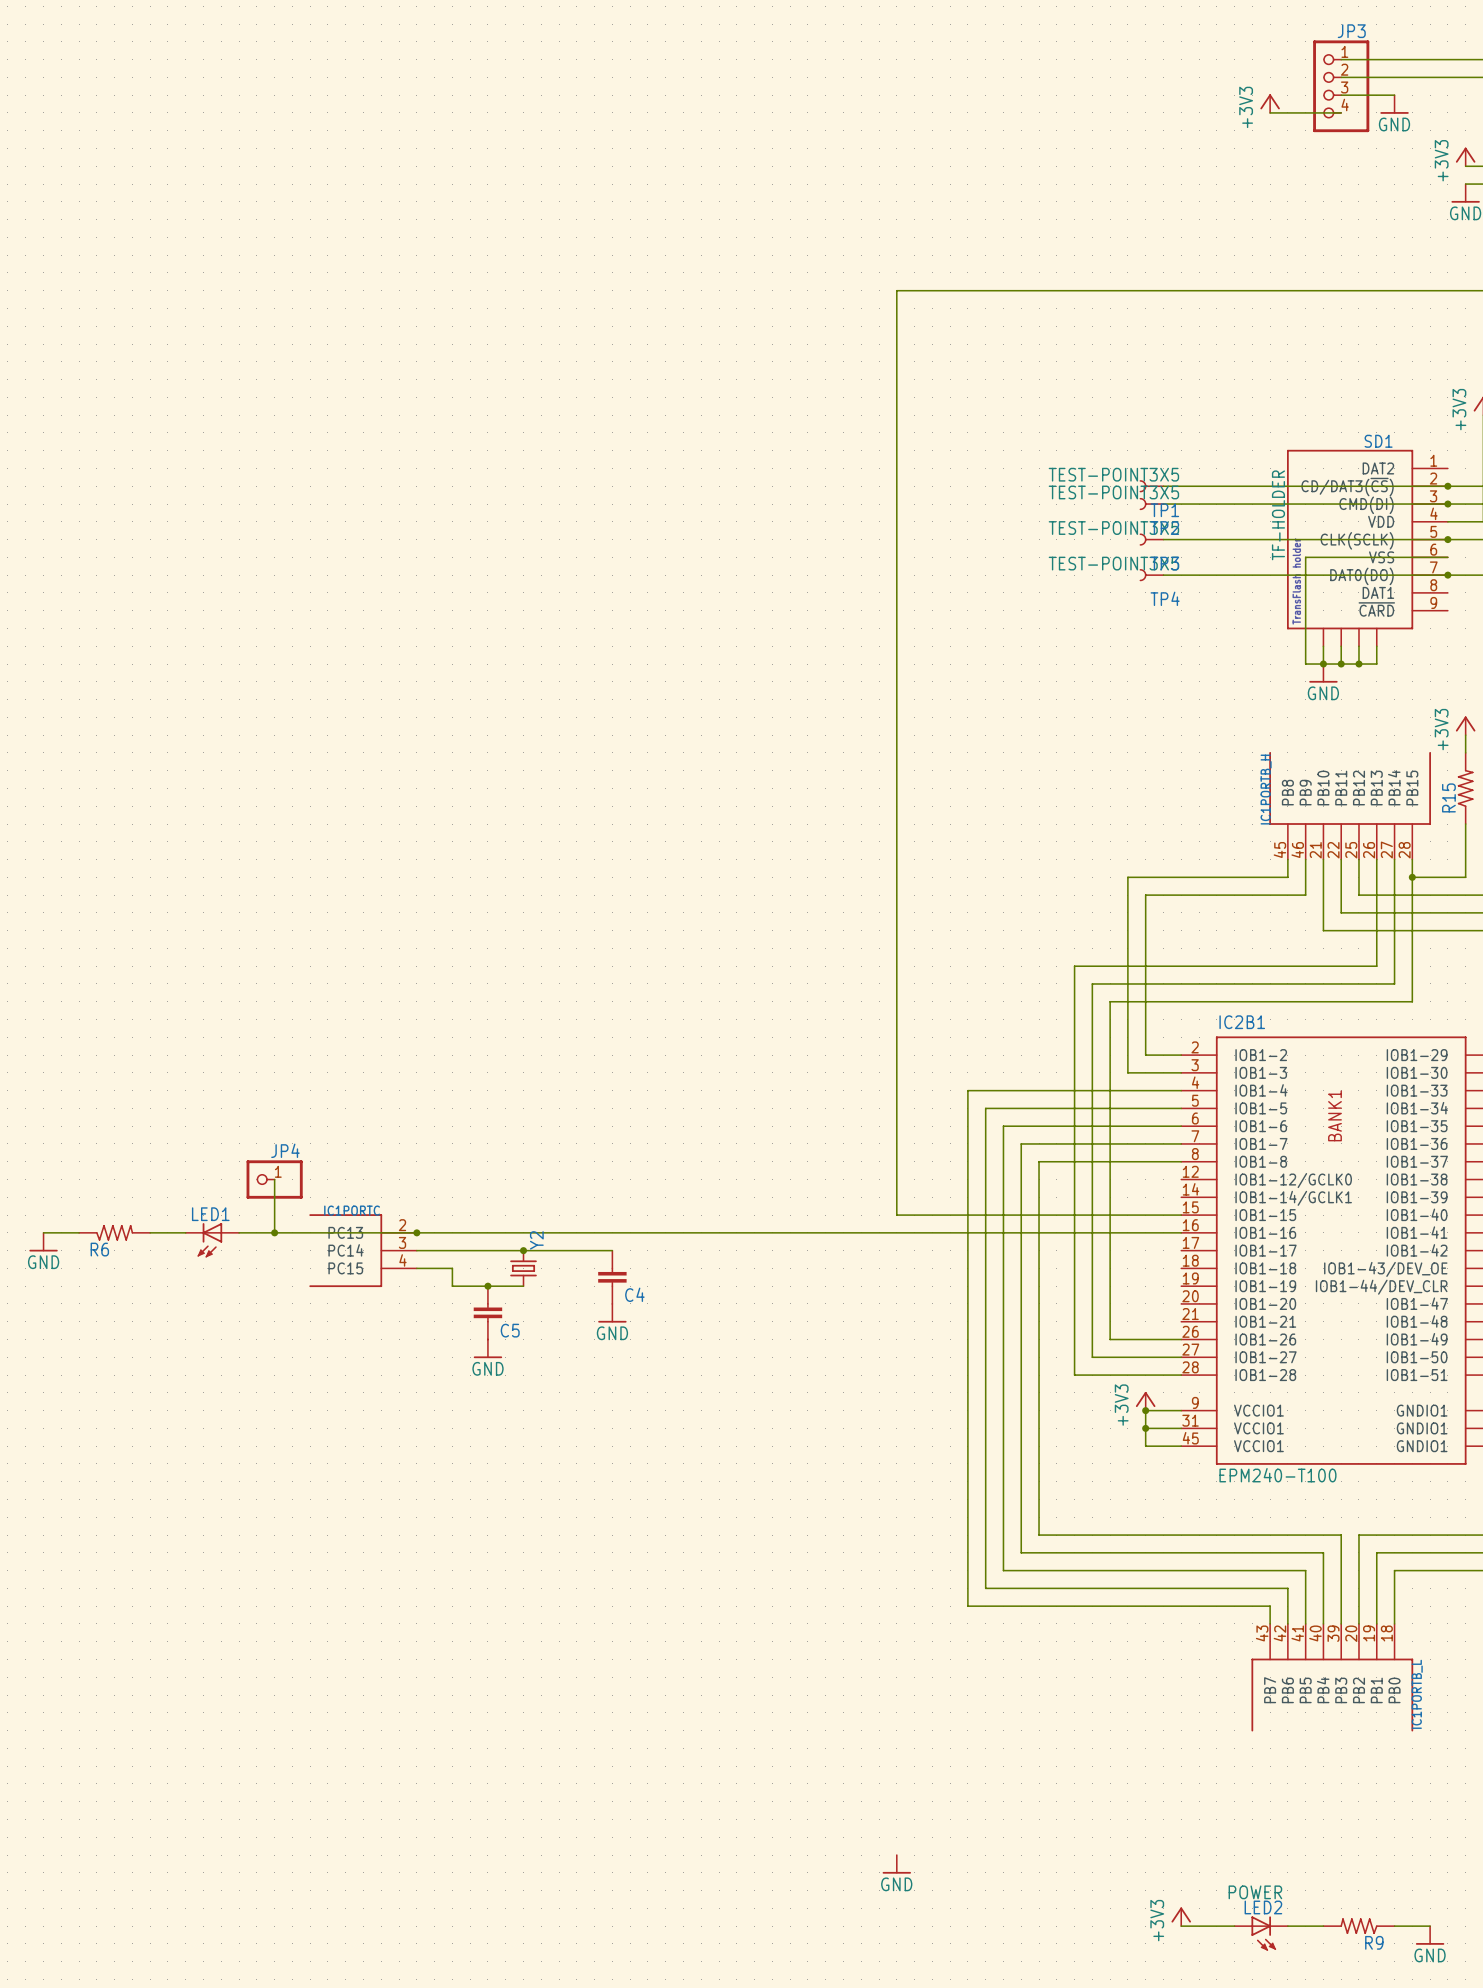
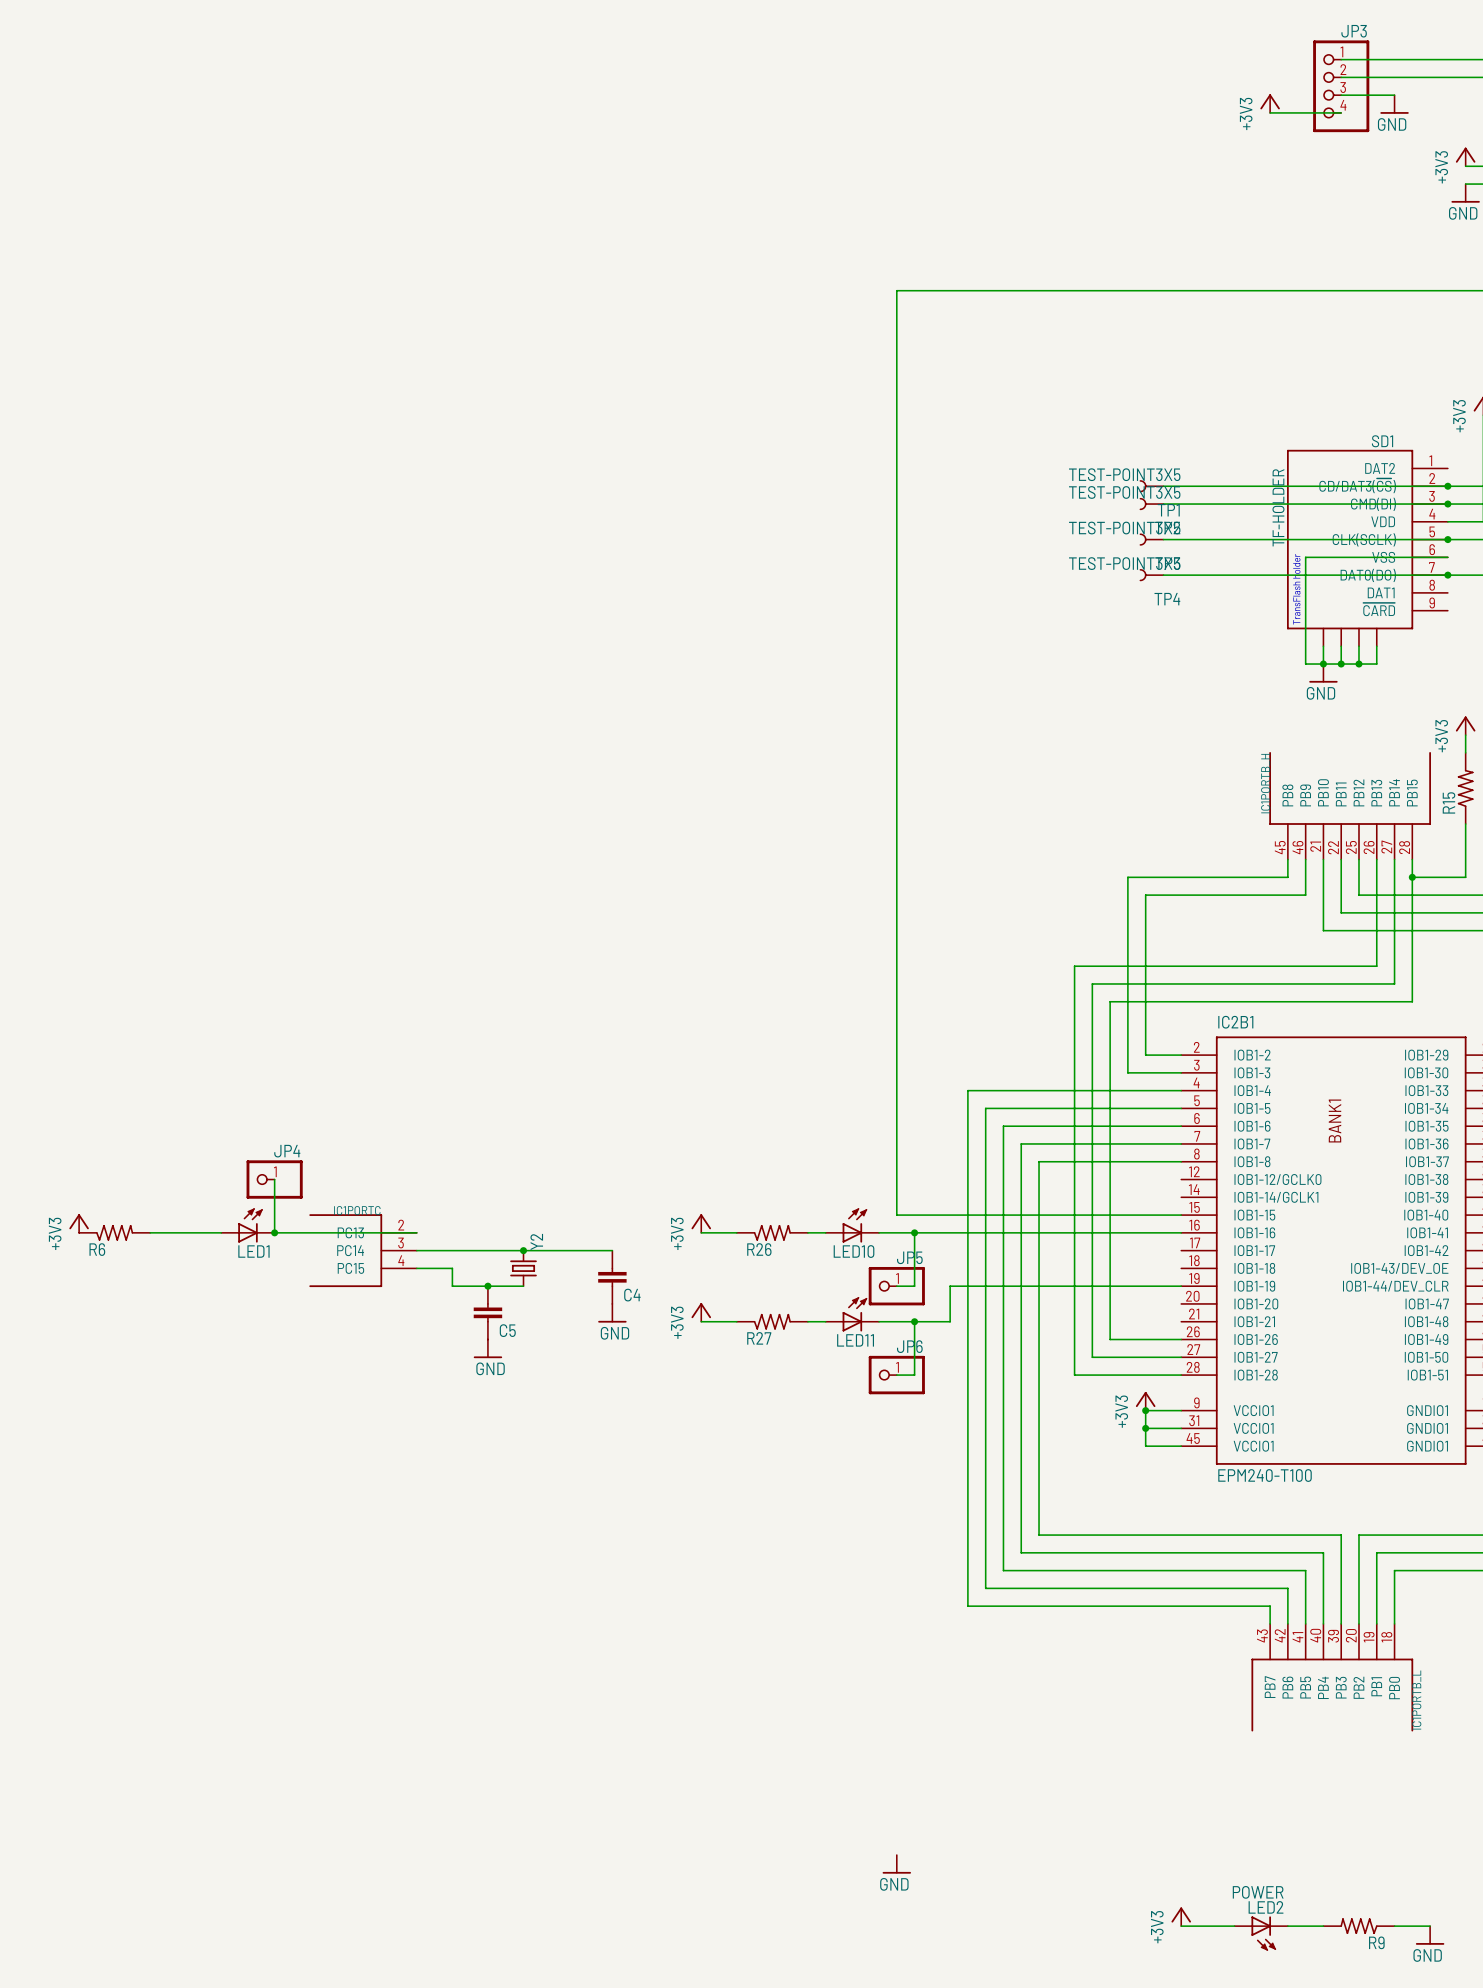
power symbol: none -> +3V3 (79, 1223)
power symbol: none -> +3V3 (701, 1223)
LED10: none -> (852, 1225)
wire: (43, 1232) (79, 1232) -> none
wire: (416, 1232) (701, 1232) -> none
junction: (416, 1232) -> none
R26: none -> (772, 1232)
wire: none -> (914, 1232) (914, 1286) (896, 1286)
junction: none -> (914, 1232)
LED1 rotation: 0° (209, 1240) -> 180° (250, 1225)
LED1 position: (212, 1240) -> (247, 1225)
power symbol: GND (43, 1242) -> none
JP5: none -> (896, 1286)
wire: none -> (1181, 1286) (950, 1286) (950, 1321) (879, 1321)
power symbol: none -> +3V3 (701, 1312)
LED11: none -> (852, 1314)
wire: none -> (701, 1321) (736, 1321)
R27: none -> (772, 1321)
wire: none -> (807, 1321) (825, 1321)
wire: none -> (914, 1321) (914, 1375) (896, 1375)
junction: none -> (914, 1321)
JP6: none -> (896, 1375)

